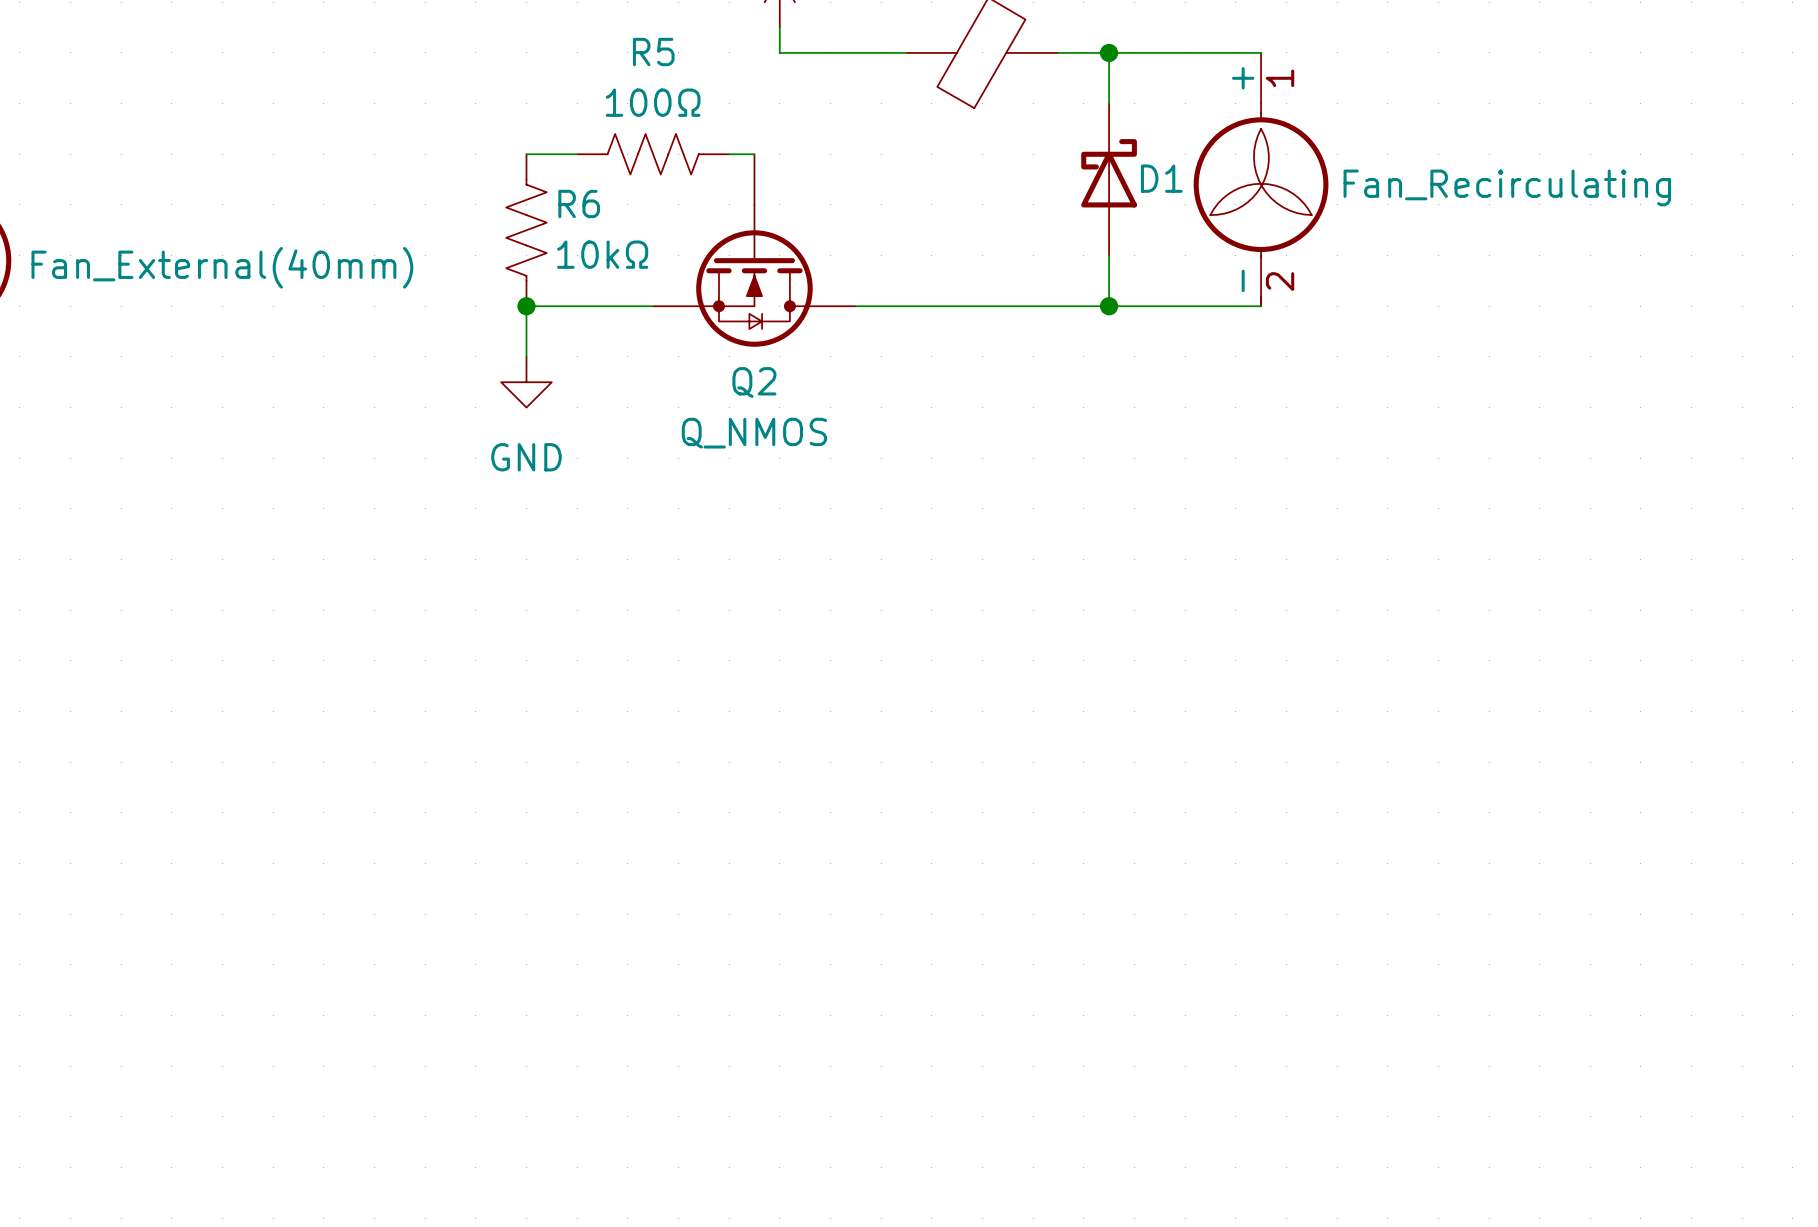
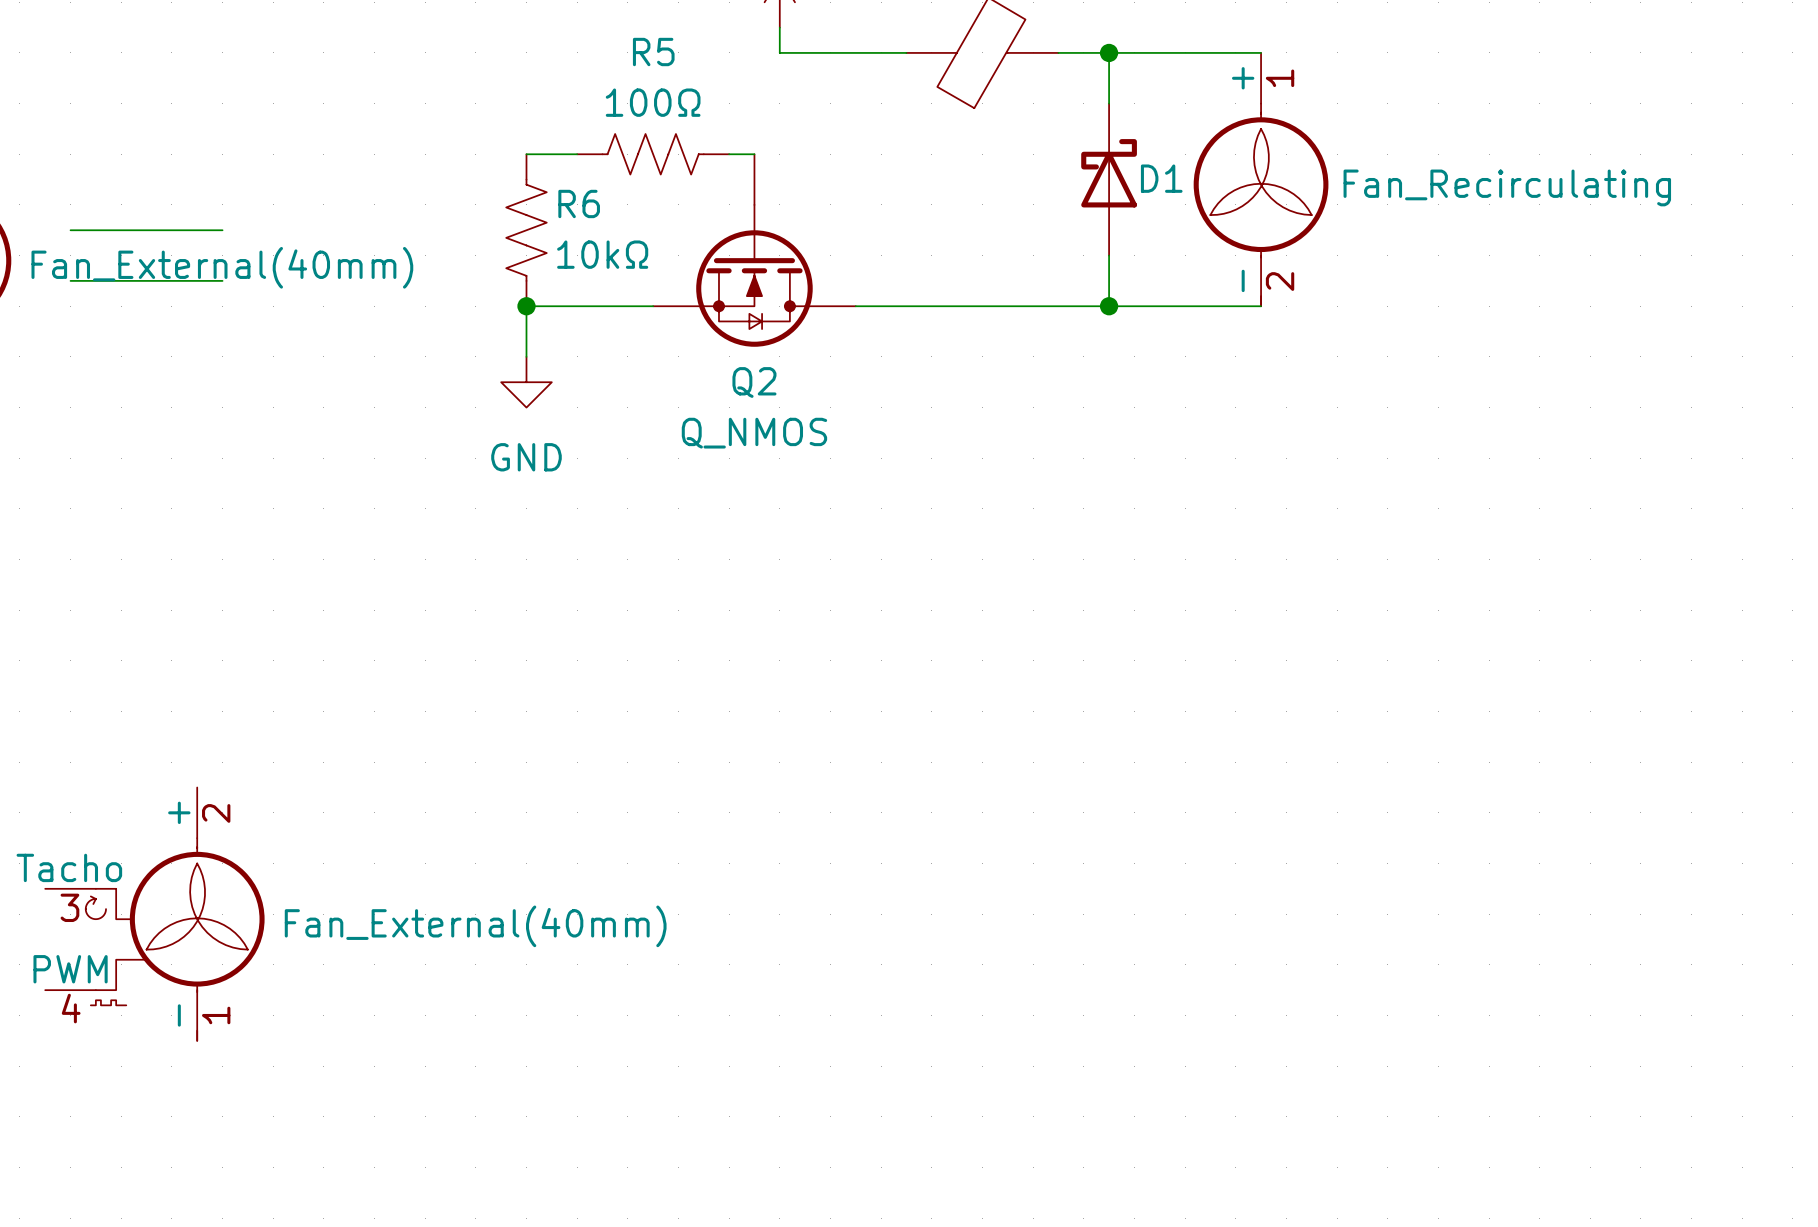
wire: none -> (70, 230) (222, 230)
wire: none -> (70, 280) (222, 280)
part: none -> Fan_External(40mm) (154, 914)

